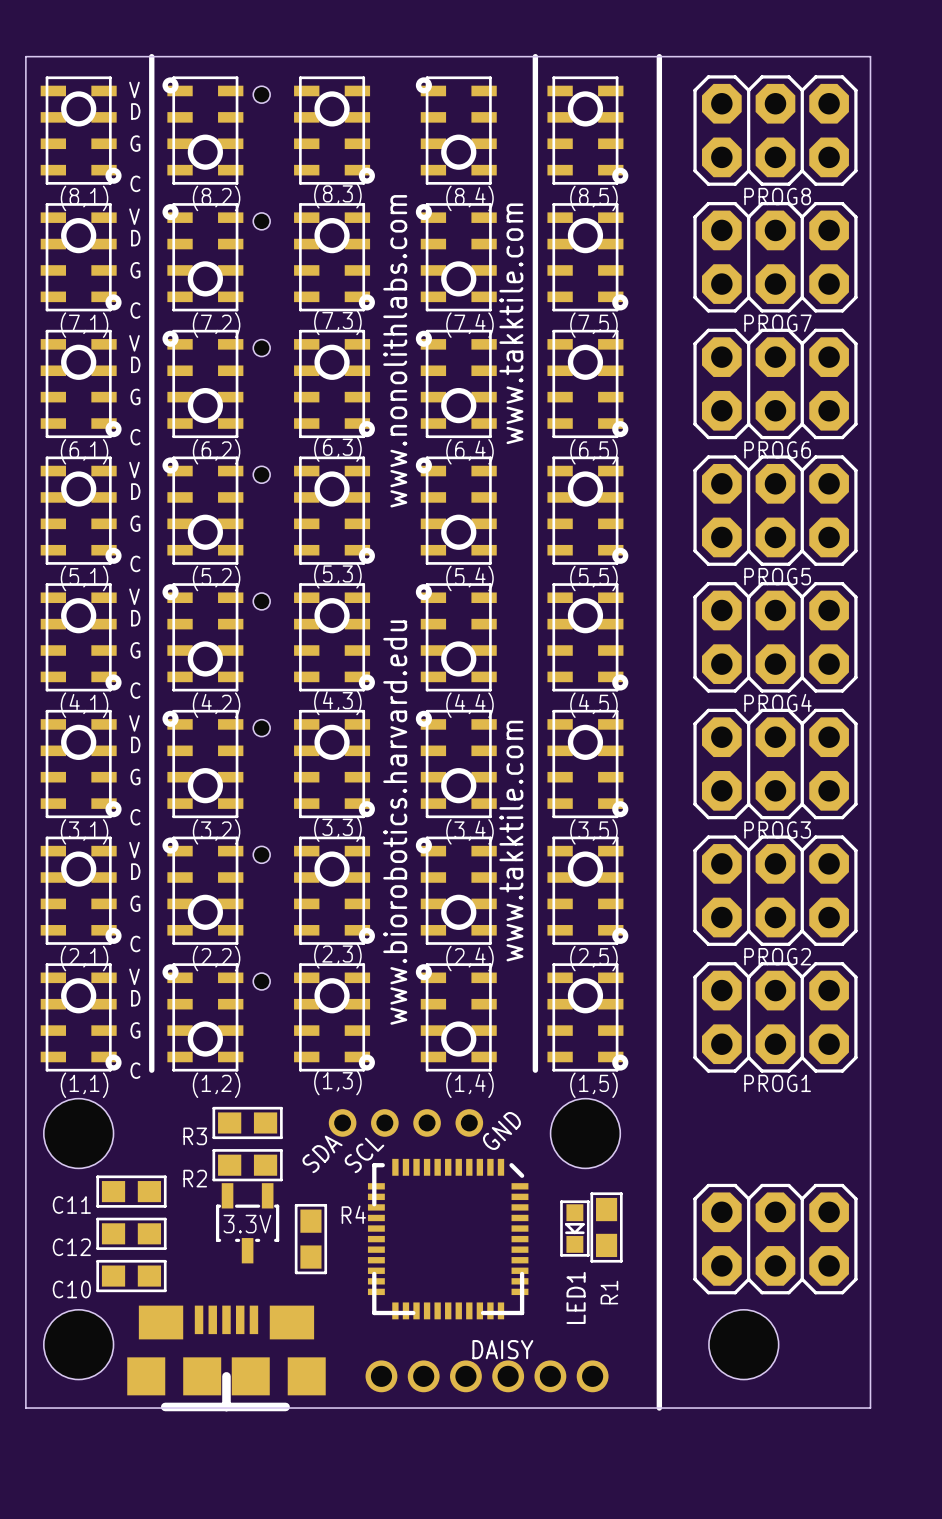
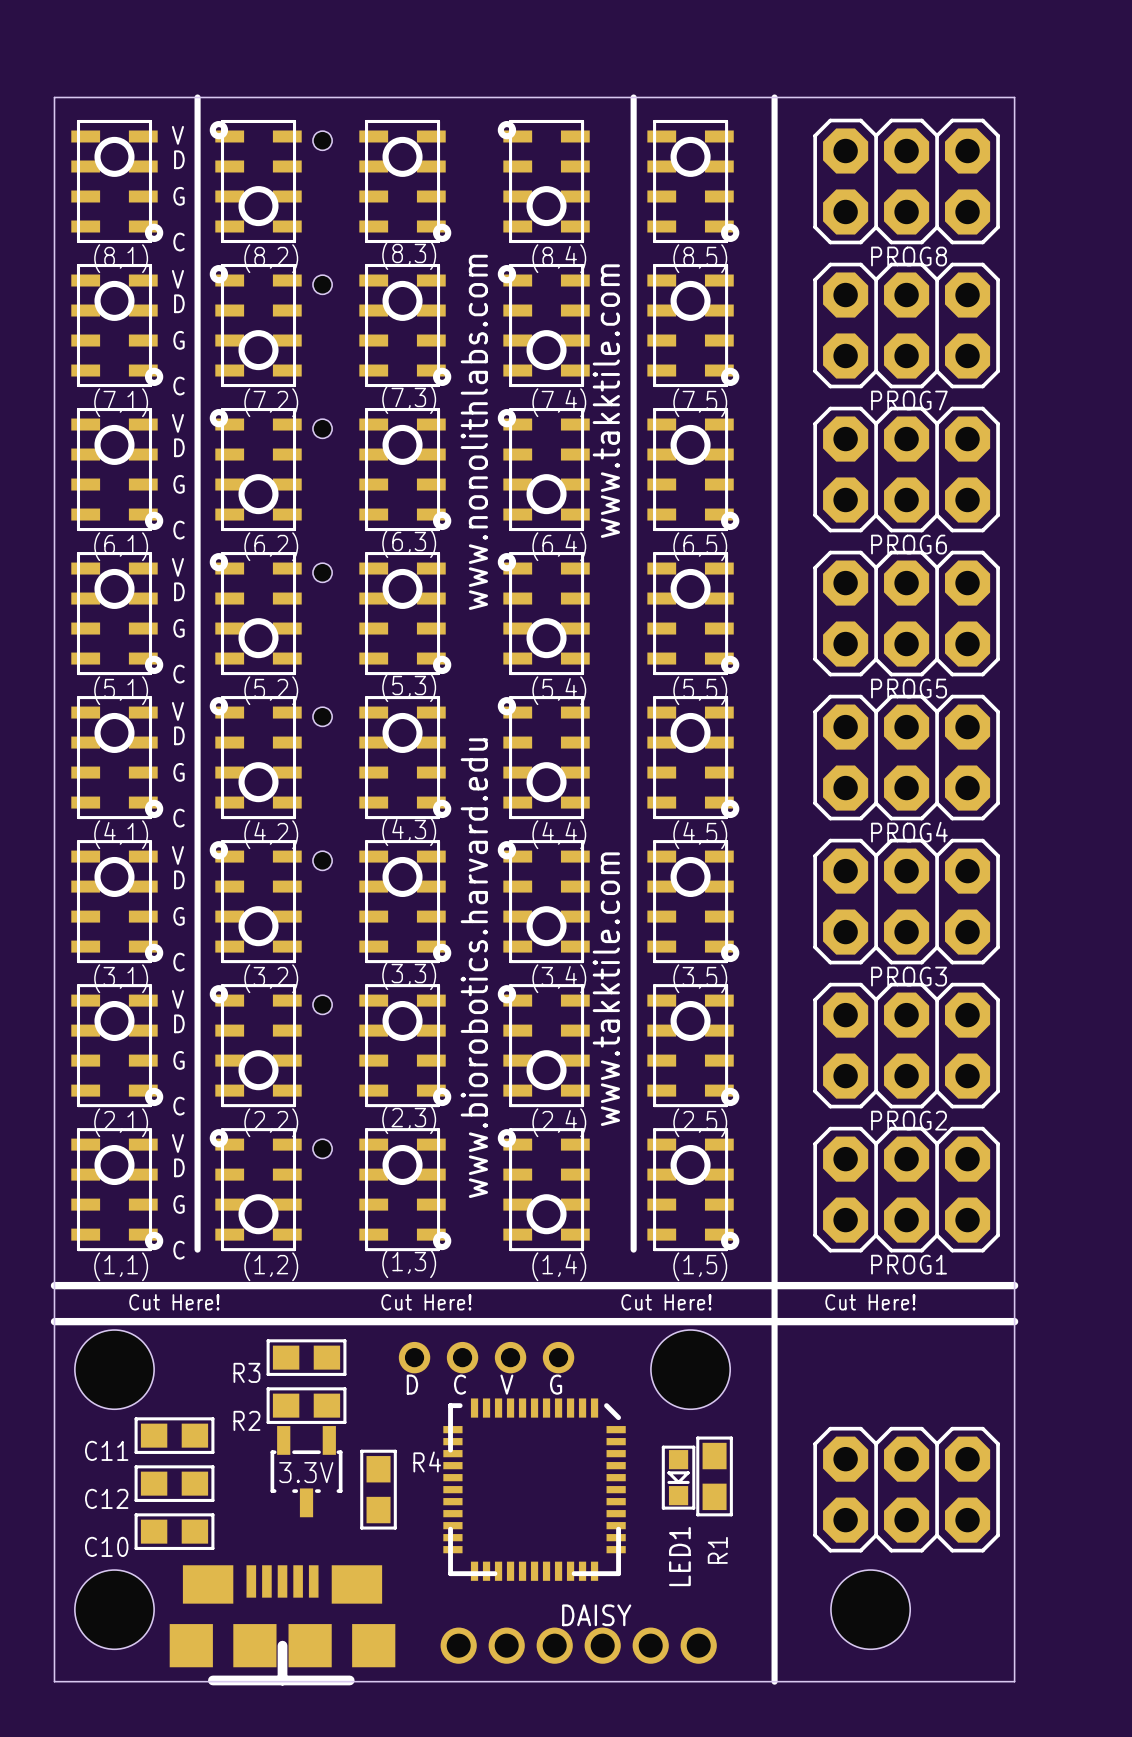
line: none -> (54, 1285) (1014, 1285)
text: none -> Cut Here! (174, 1302)
text: none -> Cut Here! (426, 1302)
text: none -> Cut Here! (666, 1302)
text: none -> Cut Here! (870, 1302)
R3: (247, 1122) -> none
part: (342, 1122) -> none
part: (384, 1122) -> none
part: (427, 1122) -> none
part: (469, 1122) -> none
text: GND (501, 1130) -> none
line: none -> (54, 1321) (1014, 1321)
part position: (78, 1133) -> (114, 1369)
part position: (585, 1133) -> (690, 1369)
text: SDA (322, 1154) -> none
text: SCL (364, 1155) -> none
part: none -> (414, 1357)
part: none -> (462, 1357)
part: none -> (510, 1357)
part: none -> (558, 1357)
R2 name: R2 (195, 1178) -> R3 (246, 1372)
text: none -> D (412, 1384)
text: none -> C (460, 1384)
text: none -> V (506, 1384)
text: none -> G (556, 1384)
C11: (131, 1191) -> none
R2: none -> (306, 1405)
3.3V position: (247, 1223) -> (306, 1471)
R1 position: (606, 1227) -> (714, 1476)
LED1 position: (574, 1228) -> (678, 1477)
R4 position: (310, 1239) -> (378, 1489)
part position: (448, 1239) -> (534, 1489)
part position: (775, 1239) -> (906, 1489)
C12 name: C12 (71, 1247) -> C11 (106, 1450)
C10 name: C10 (71, 1289) -> C12 (106, 1498)
C10: none -> (174, 1531)
part position: (78, 1344) -> (114, 1609)
part position: (743, 1344) -> (870, 1609)
part position: (226, 1358) -> (282, 1625)
DAISY position: (487, 1376) -> (578, 1645)
board edge: (25, 1408) (870, 1408) -> (54, 1633) (54, 1681) (1014, 1681) (1014, 1633)
line: none -> (774, 1633) (774, 1681)

